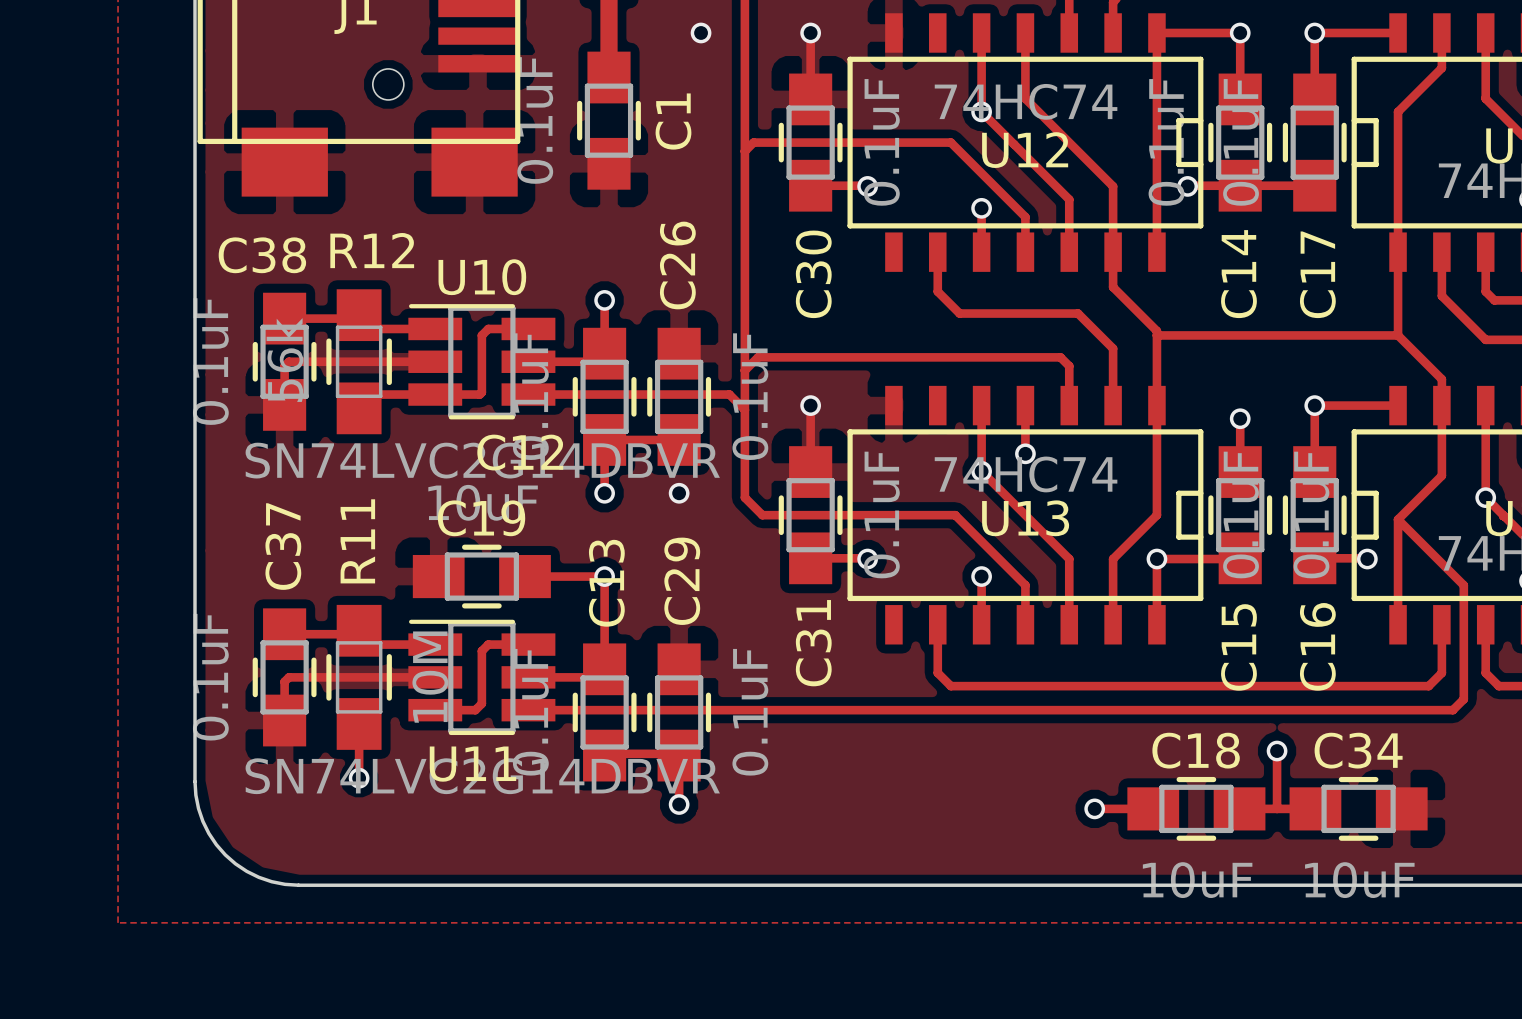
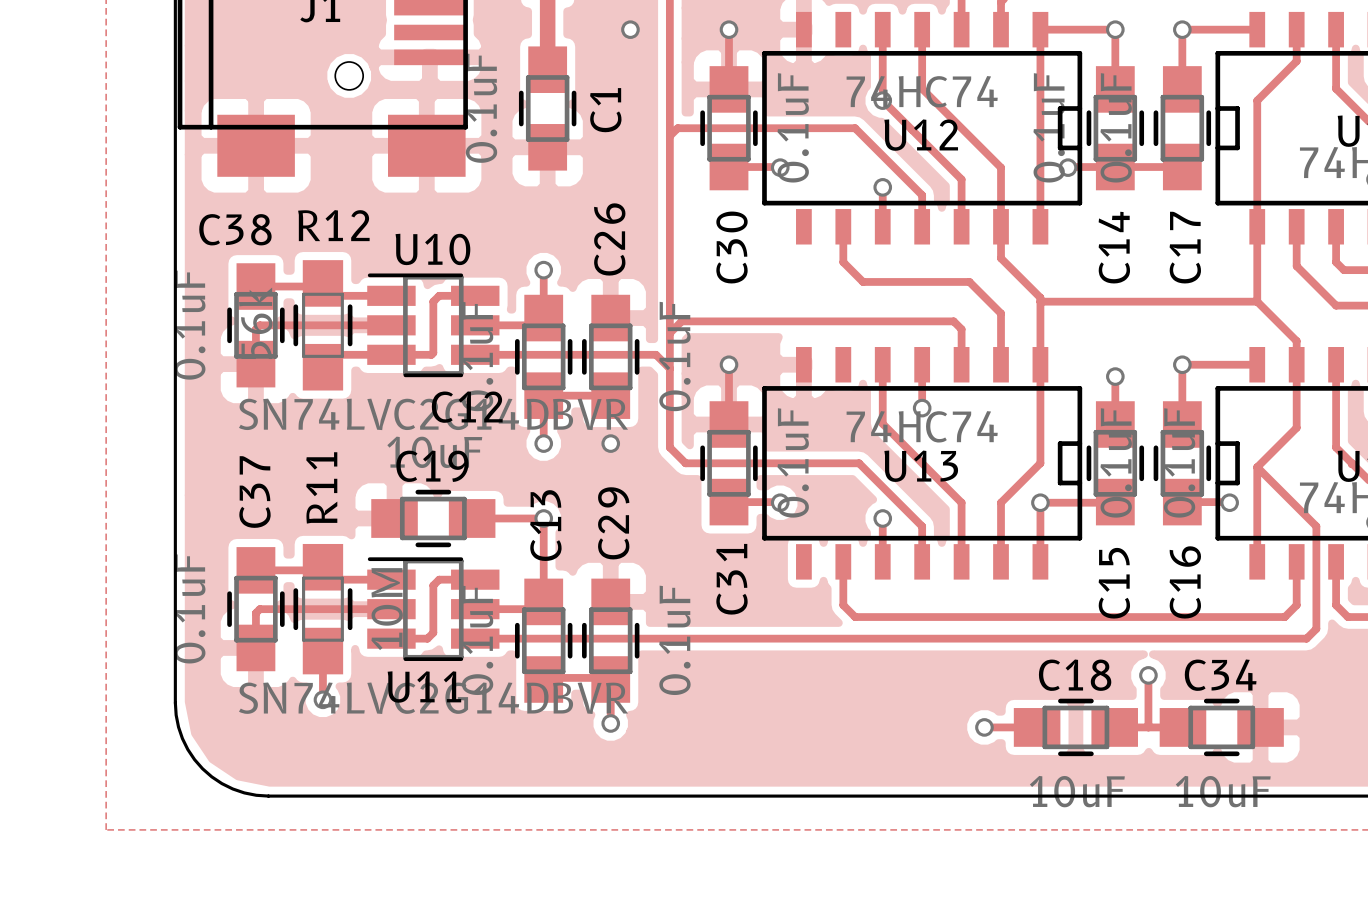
via: (981, 471) -> none
via: (1485, 497) -> none

